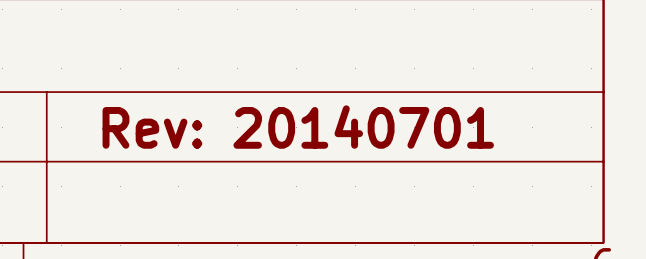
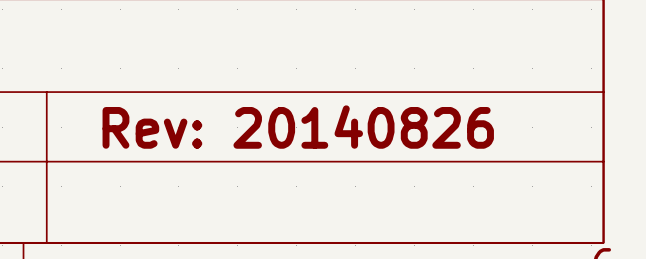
title block: Rev: 20140701 (298, 127) -> Rev: 20140826 (298, 127)

